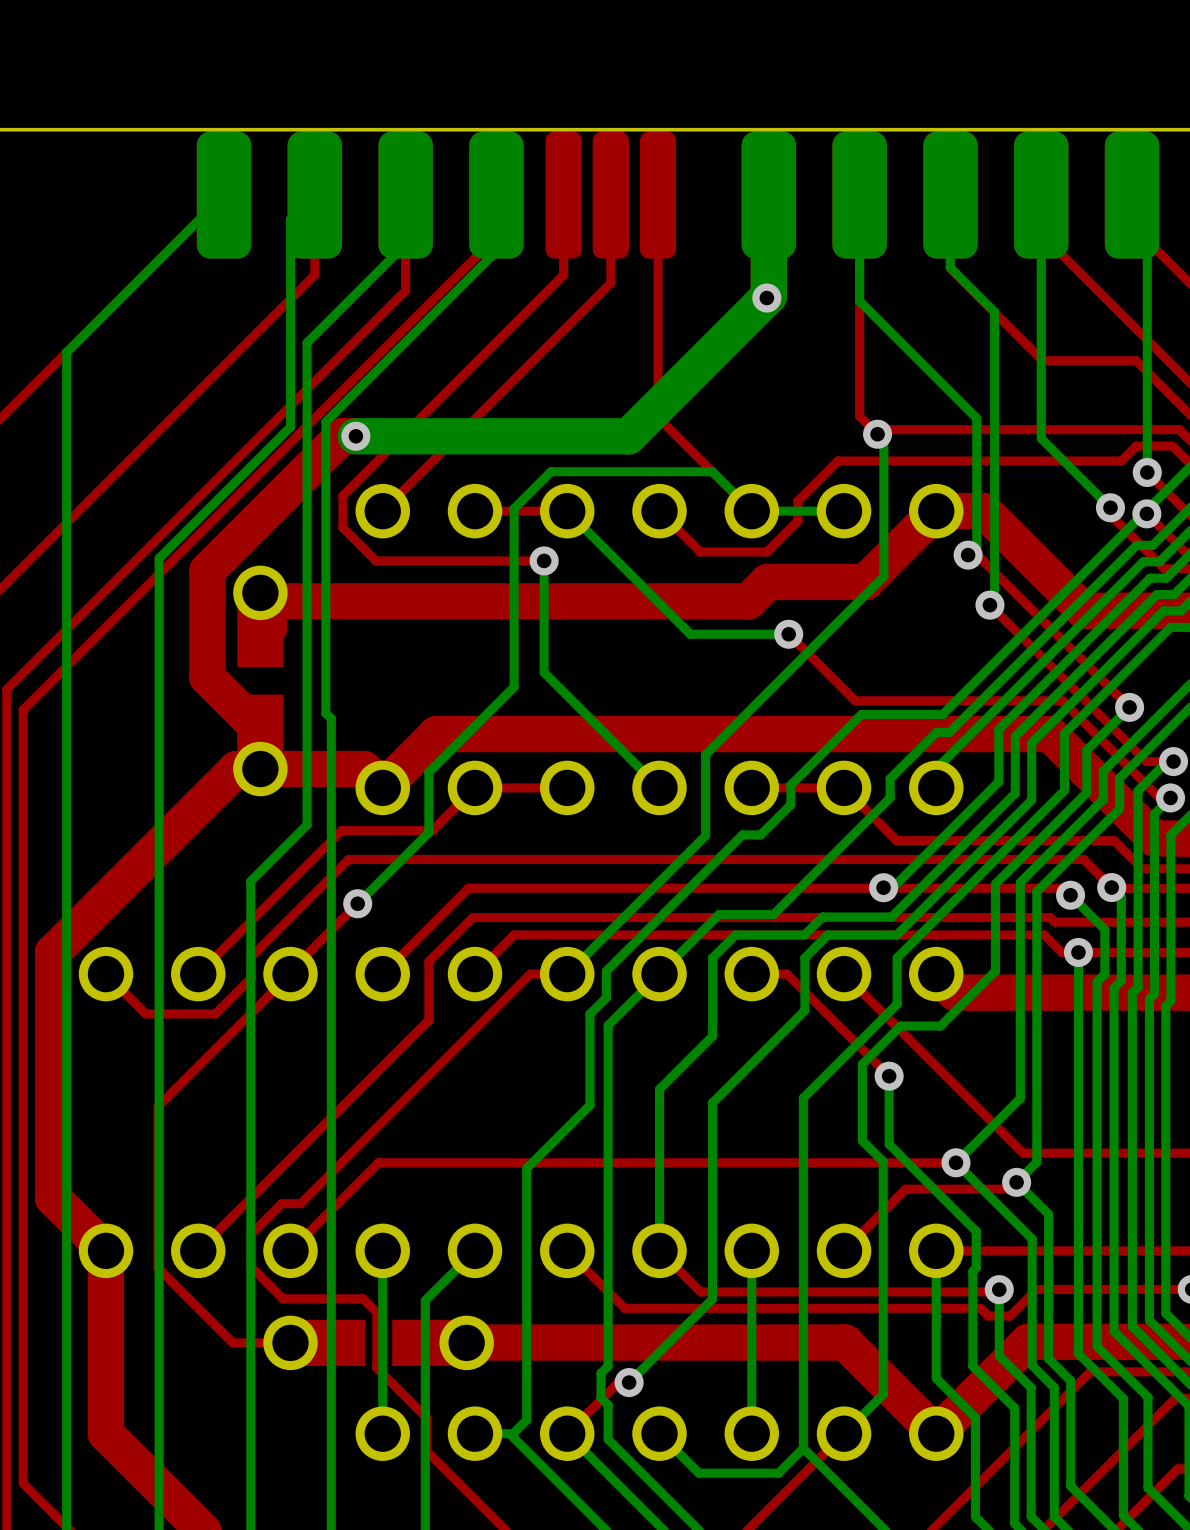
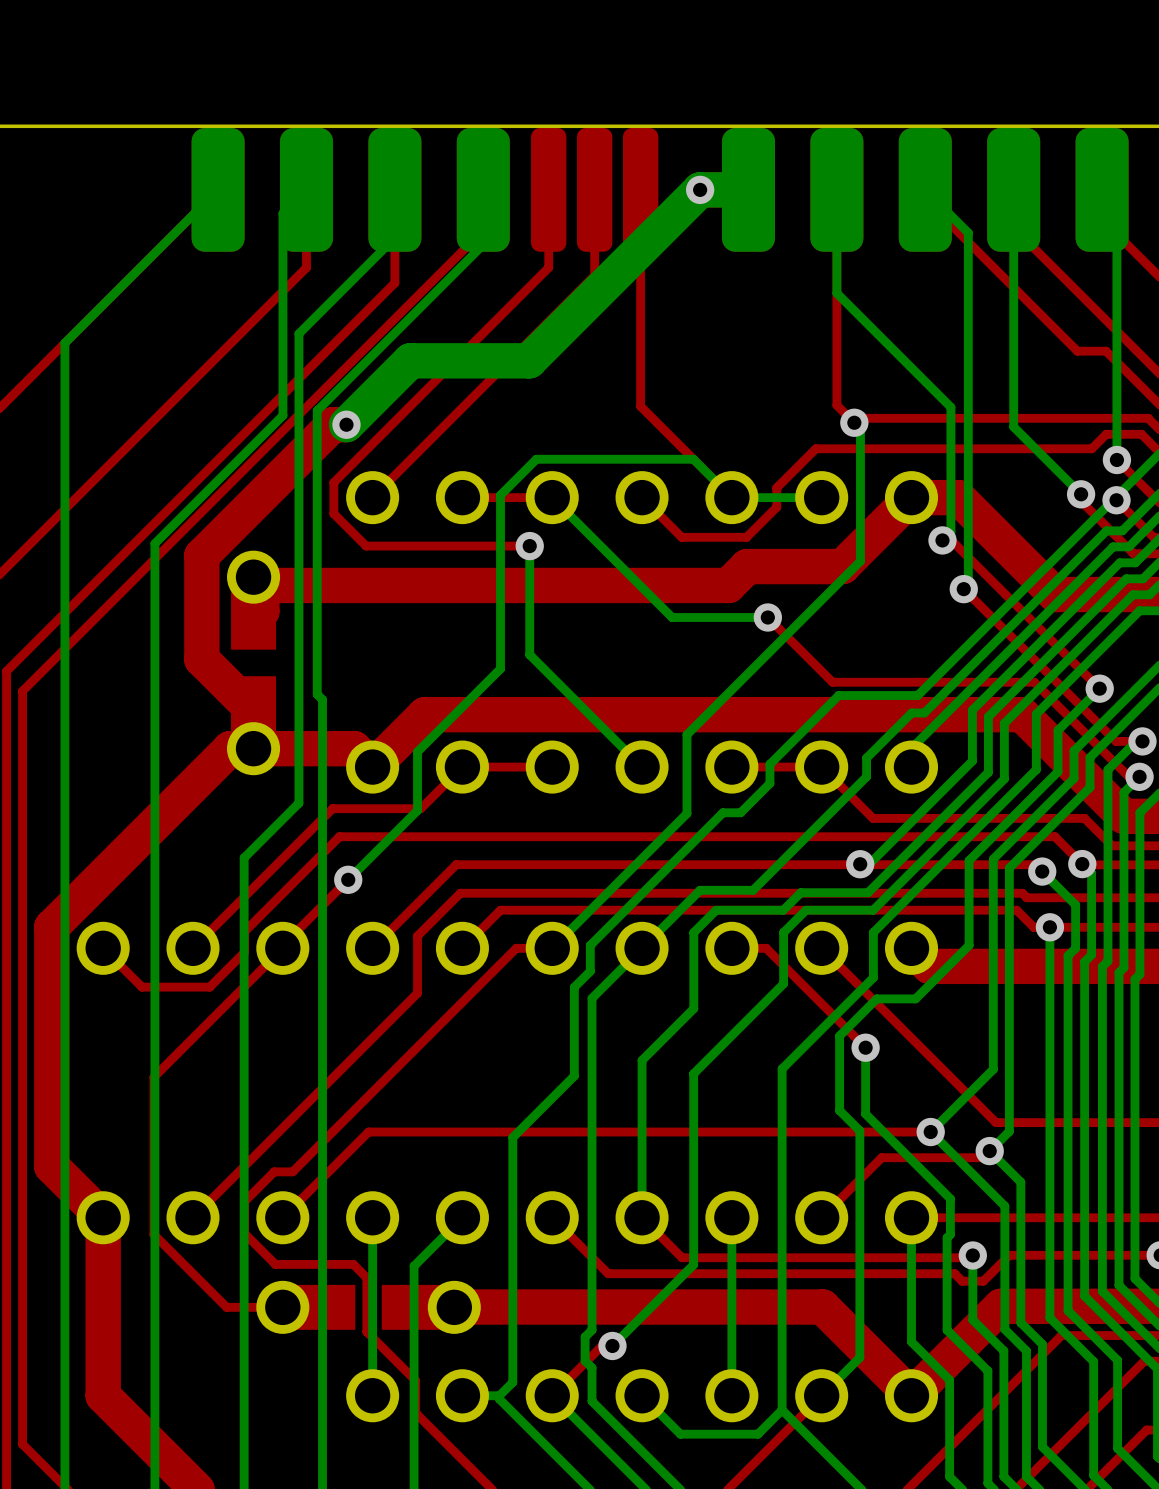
bottom track: (768, 195) (768, 296) (628, 436) (355, 436) -> (748, 189) (700, 189) (529, 360) (410, 360) (346, 424)
bottom track: (950, 195) (950, 267) (994, 312) -> (925, 189) (968, 232) (968, 303)
top track: (950, 204) (950, 268) (1042, 360) (1106, 360) -> (925, 199) (1077, 351)
via position: (766, 298) -> (700, 189)

